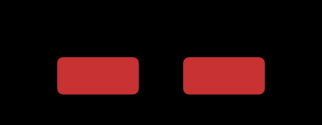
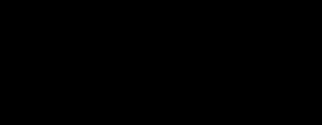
part: (160, 75) -> none

